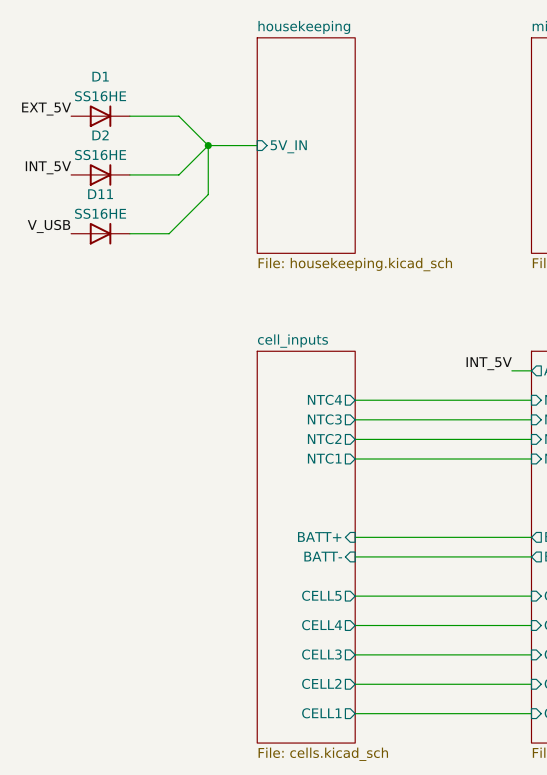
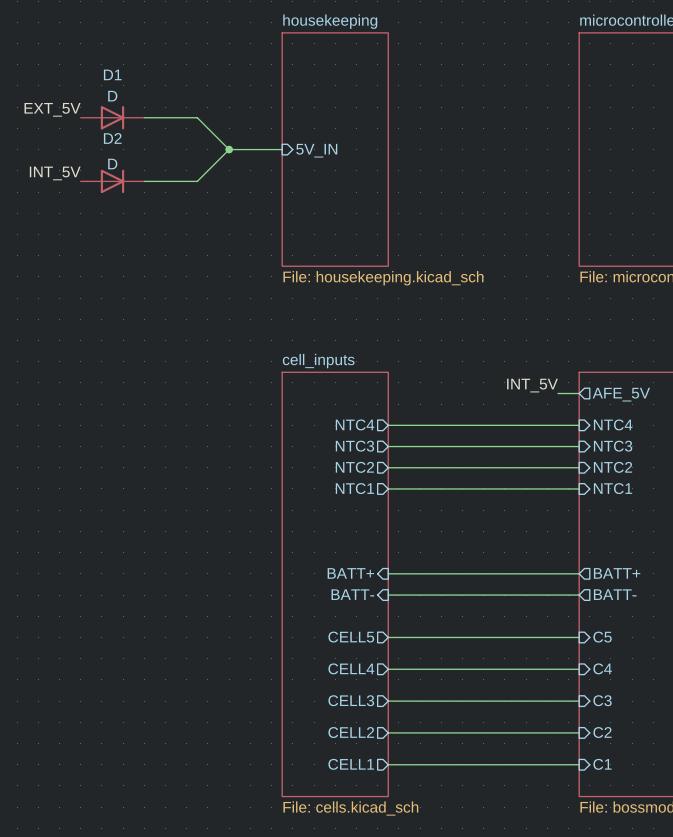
D1 value: SS16HE (100, 96) -> D (112, 96)
wire: (208, 145) (208, 194) (169, 233) (129, 233) -> none
D2 value: SS16HE (100, 155) -> D (112, 164)
label: V_USB (48, 226) -> none
D11: SS16HE (100, 233) -> none

